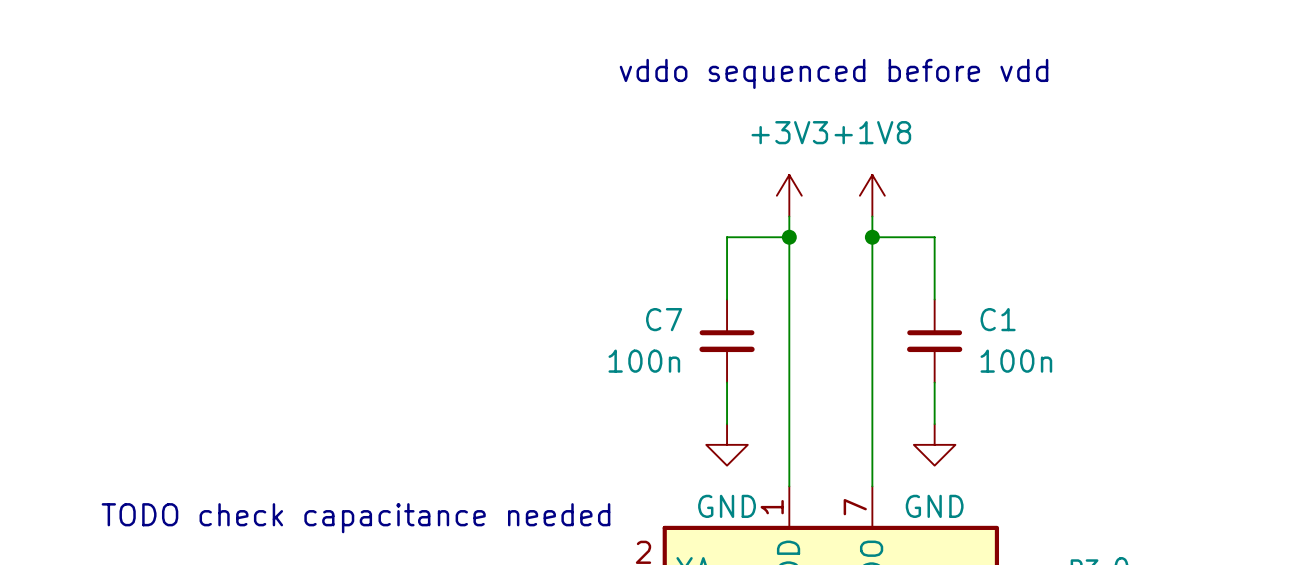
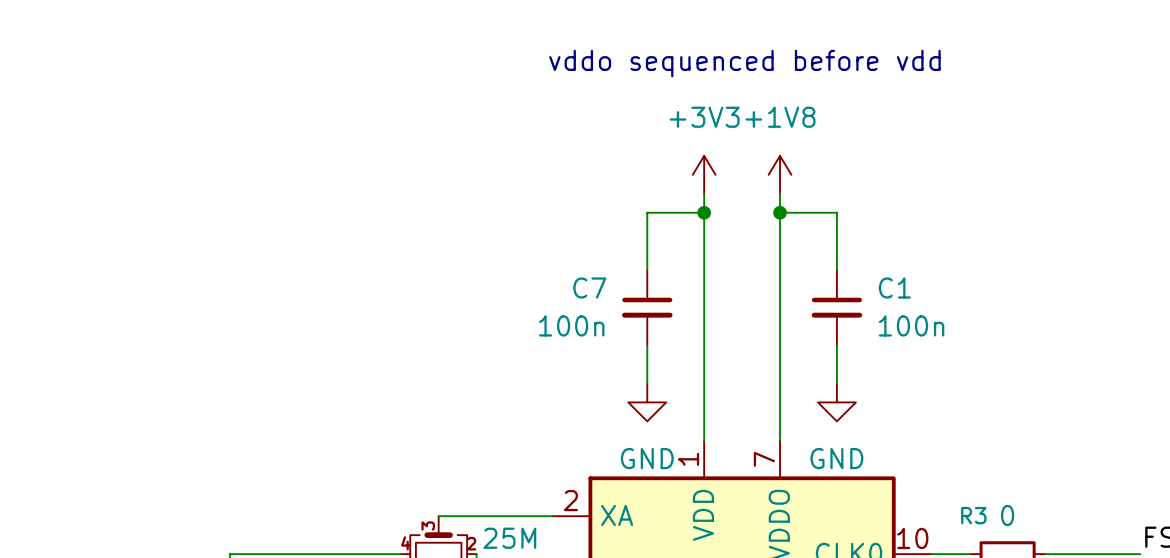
text: TODO check capacitance needed (355, 518) -> none

